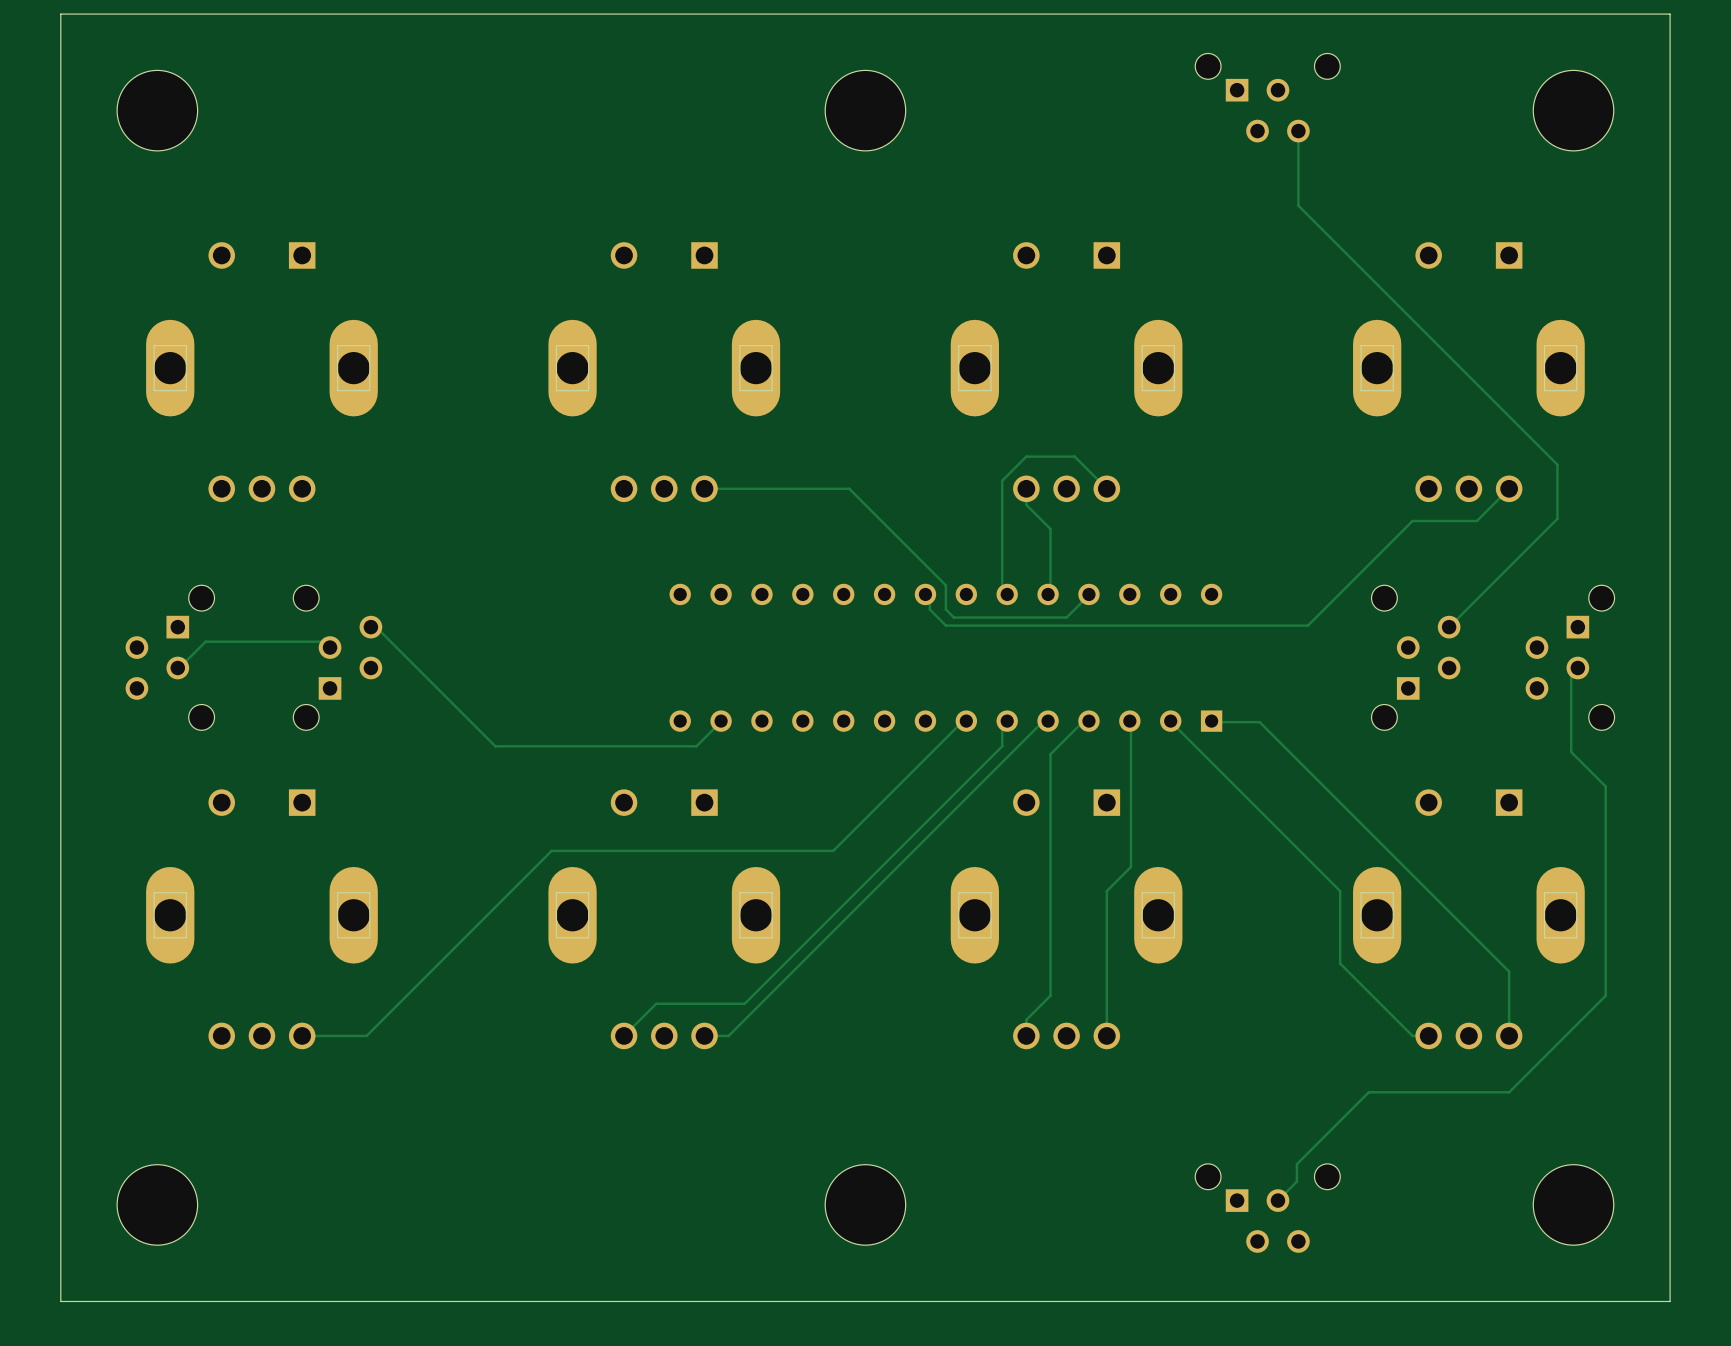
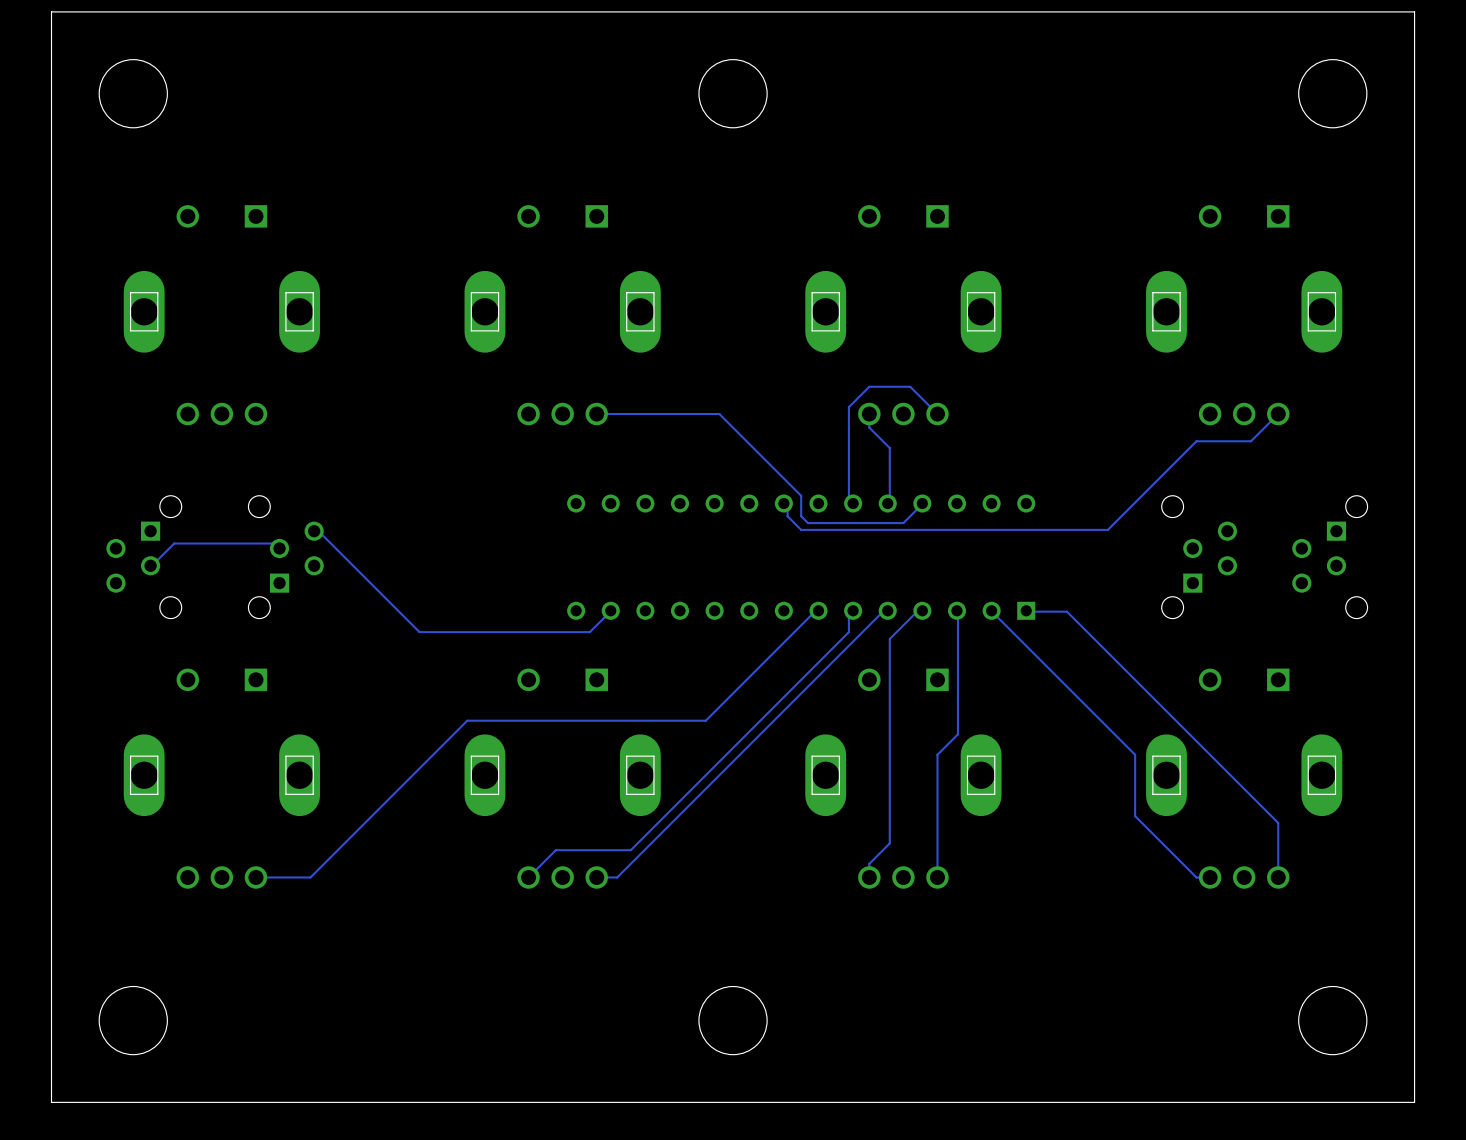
part: (1267, 97) -> none
track: (1298, 131) (1298, 205) (1557, 464) (1557, 518) (1449, 627) -> none
track: (1577, 668) (1571, 674) (1571, 752) (1605, 786) (1605, 995) (1509, 1092) (1368, 1092) (1296, 1164) (1296, 1181) (1277, 1200) -> none
part: (1267, 1208) -> none

